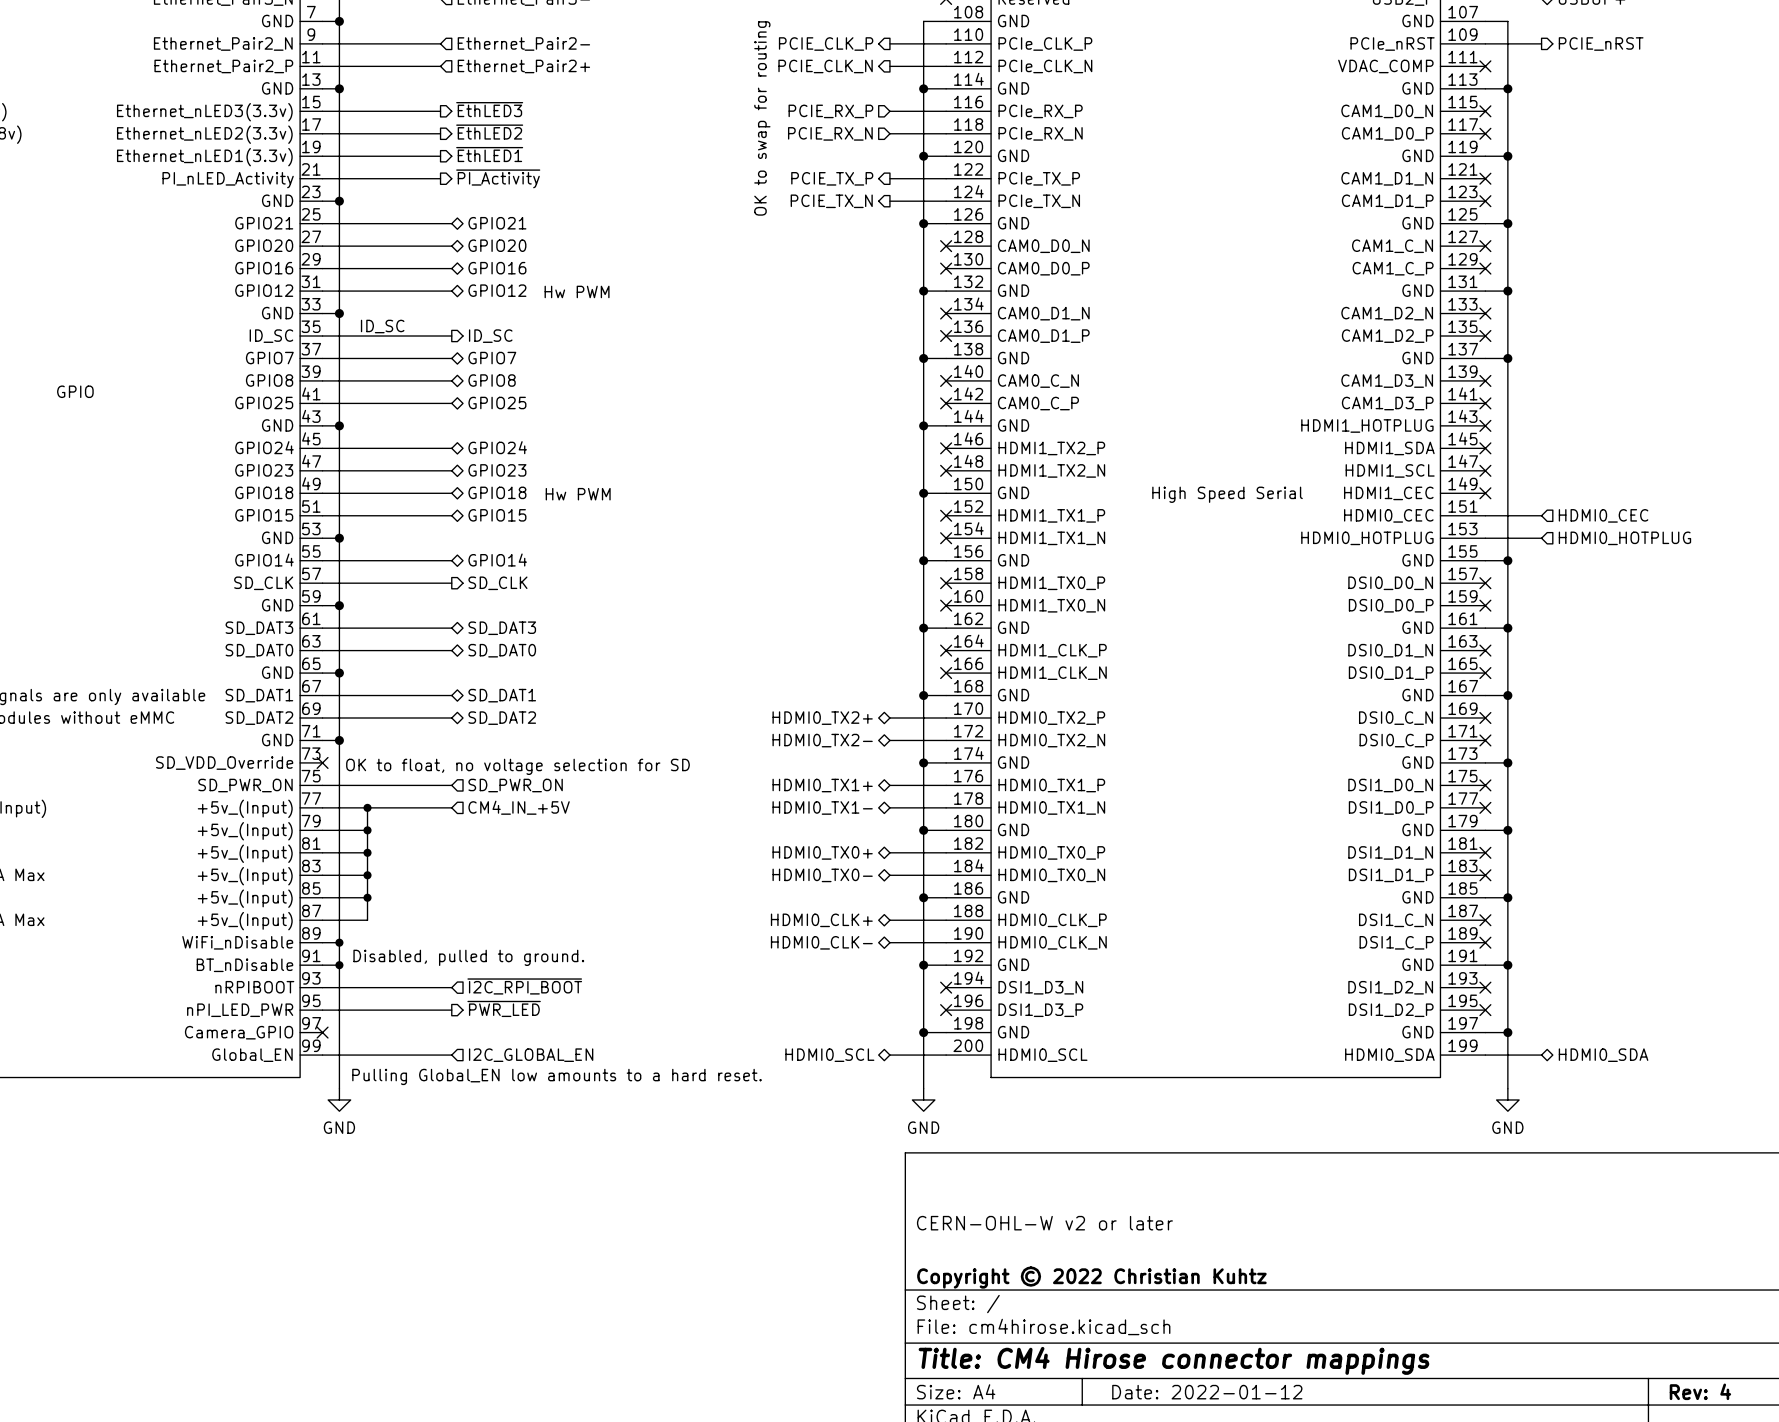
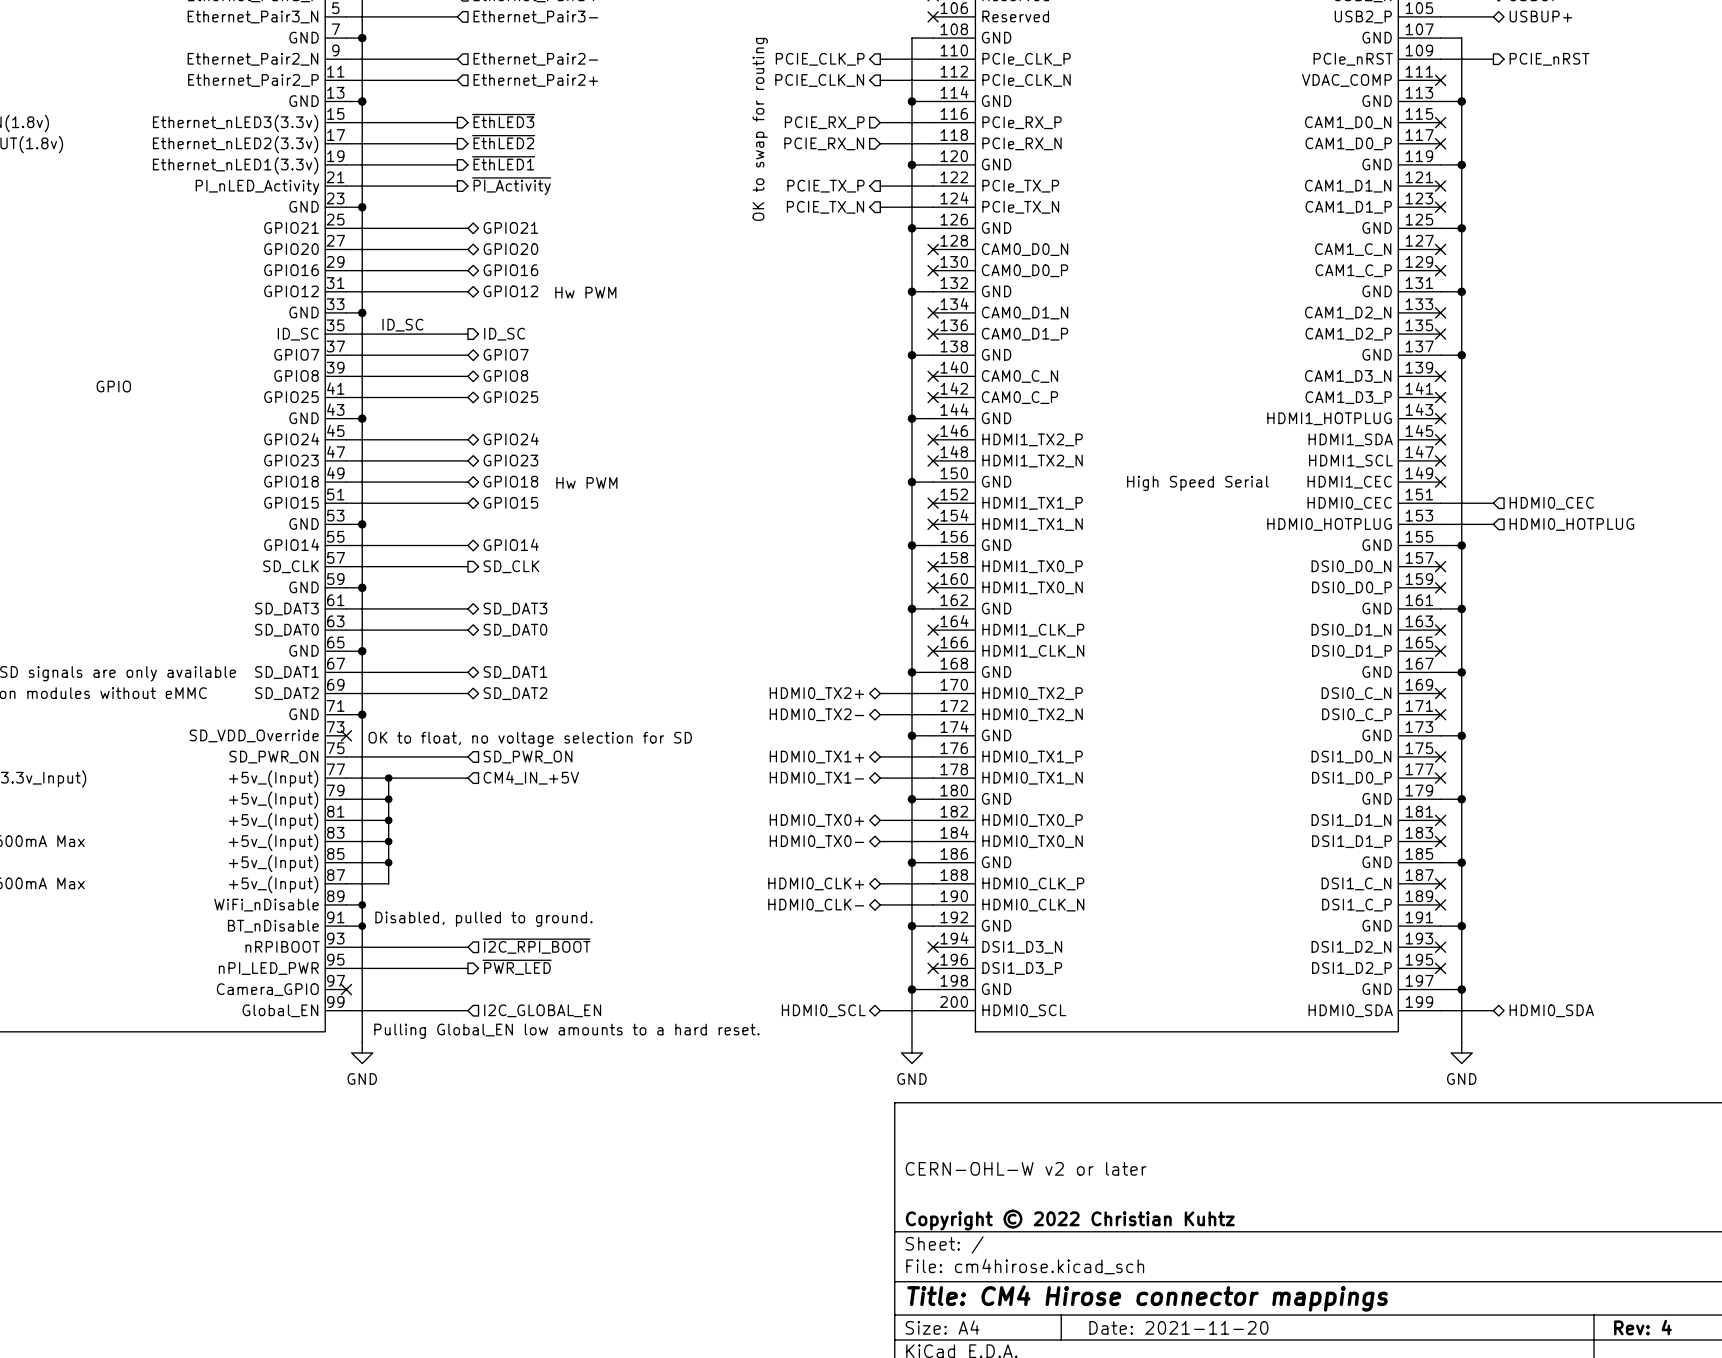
title block: Date: 2022-01-12 (1207, 1392) -> Date: 2021-11-20 (1178, 1327)

